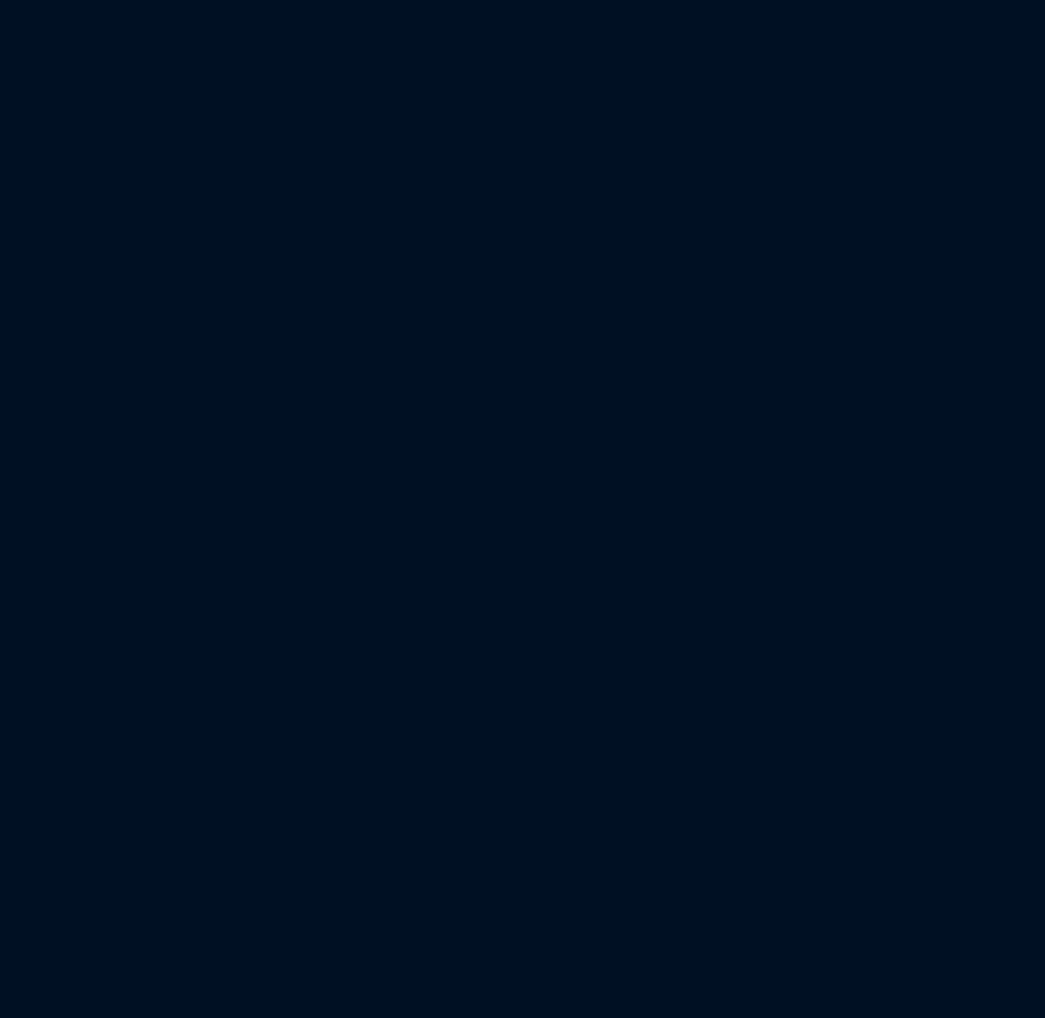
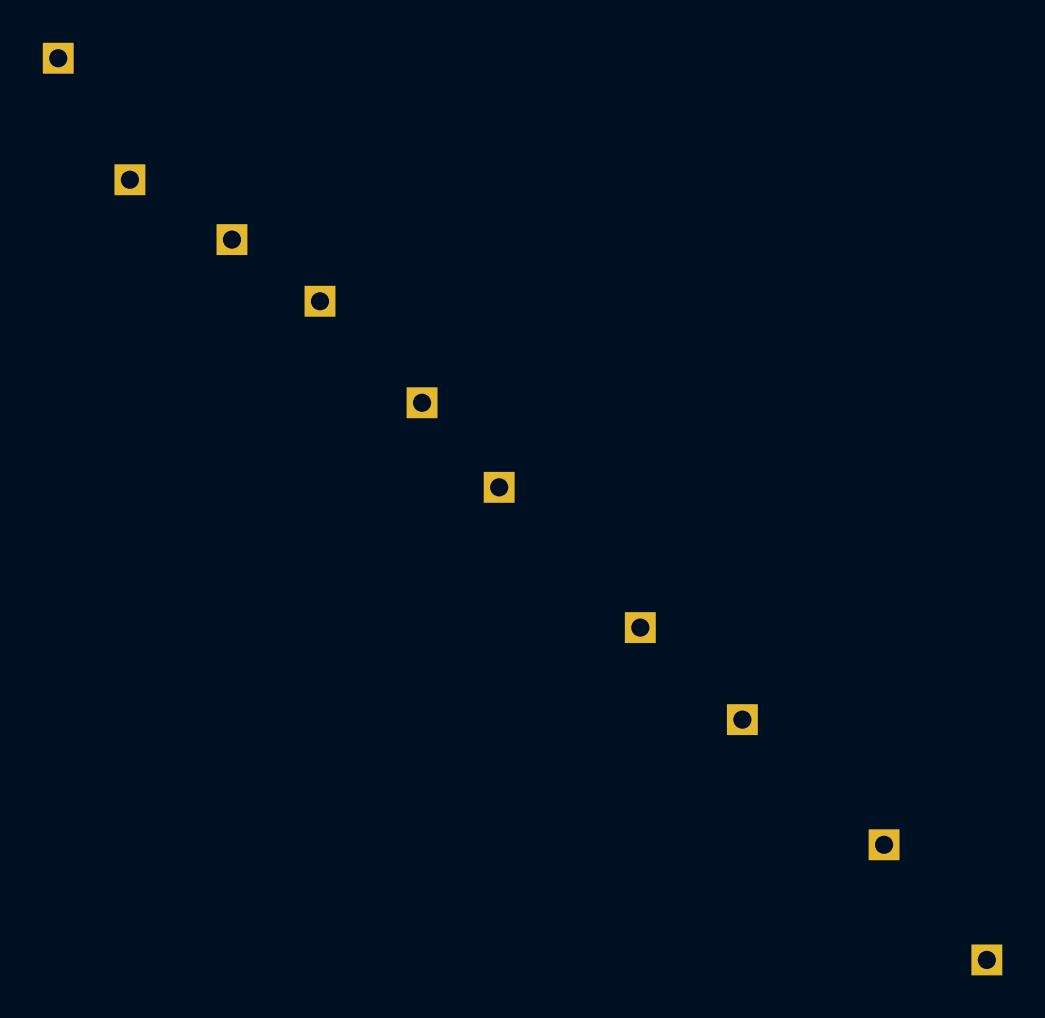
part: none -> (58, 58)
part: none -> (129, 179)
part: none -> (231, 239)
part: none -> (320, 301)
part: none -> (422, 402)
part: none -> (499, 487)
part: none -> (640, 627)
part: none -> (742, 719)
part: none -> (884, 844)
part: none -> (986, 959)

